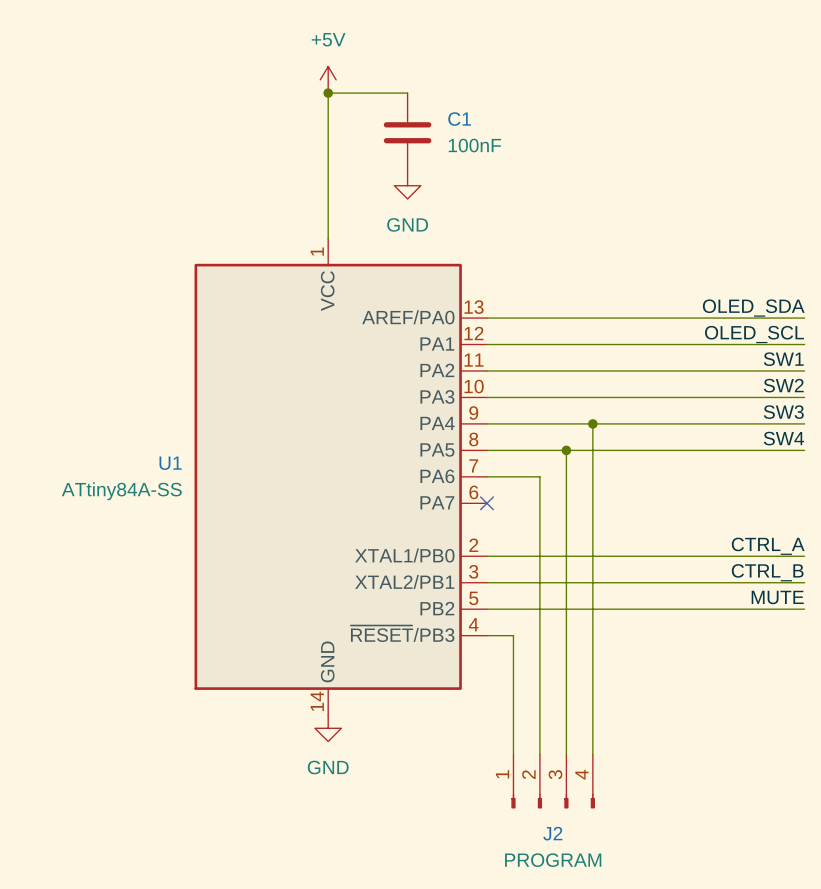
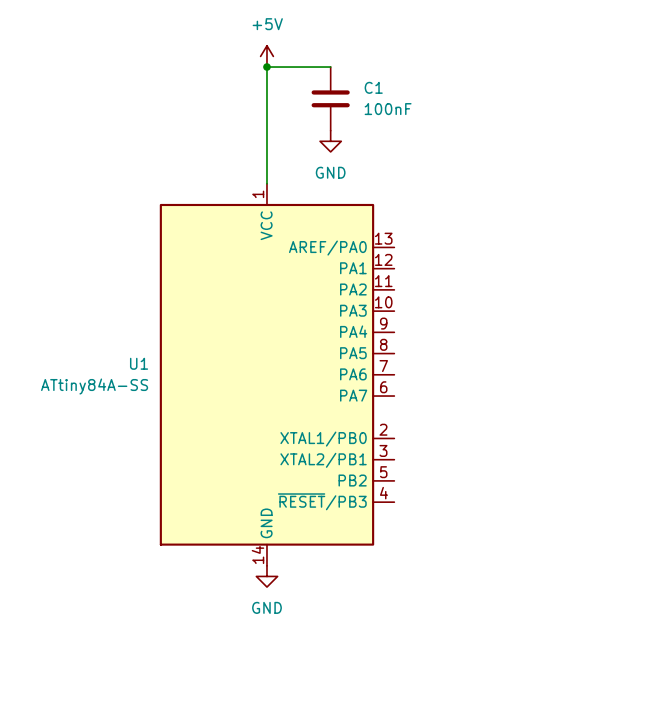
label: OLED_SDA (753, 308) -> none
wire: (487, 318) (804, 318) -> none
label: OLED_SCL (754, 334) -> none
wire: (487, 344) (804, 344) -> none
label: SW1 (783, 359) -> none
wire: (487, 370) (804, 370) -> none
label: SW2 (783, 385) -> none
wire: (487, 397) (804, 397) -> none
label: SW3 (783, 412) -> none
wire: (487, 423) (804, 423) -> none
wire: (592, 423) (592, 754) -> none
junction: (592, 423) -> none
label: SW4 (783, 438) -> none
wire: (487, 450) (804, 450) -> none
wire: (566, 450) (566, 754) -> none
junction: (566, 450) -> none
wire: (487, 476) (539, 476) (539, 754) -> none
no-connect mark: (487, 503) -> none
label: CTRL_A (768, 546) -> none
wire: (487, 556) (804, 556) -> none
label: CTRL_B (767, 572) -> none
wire: (487, 582) (804, 582) -> none
label: MUTE (777, 597) -> none
wire: (487, 609) (804, 609) -> none
wire: (487, 635) (513, 635) (513, 754) -> none
J2: PROGRAM (553, 781) -> none

